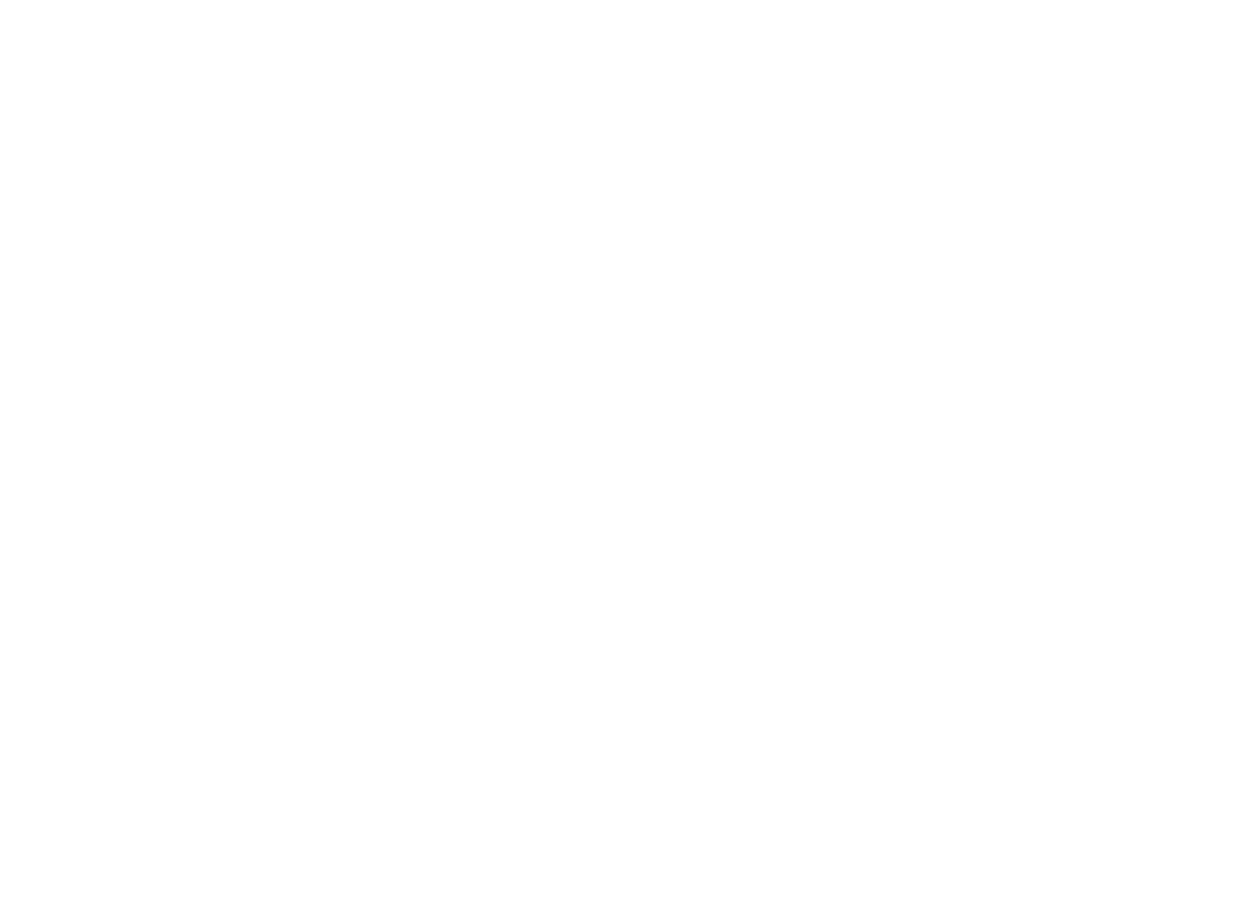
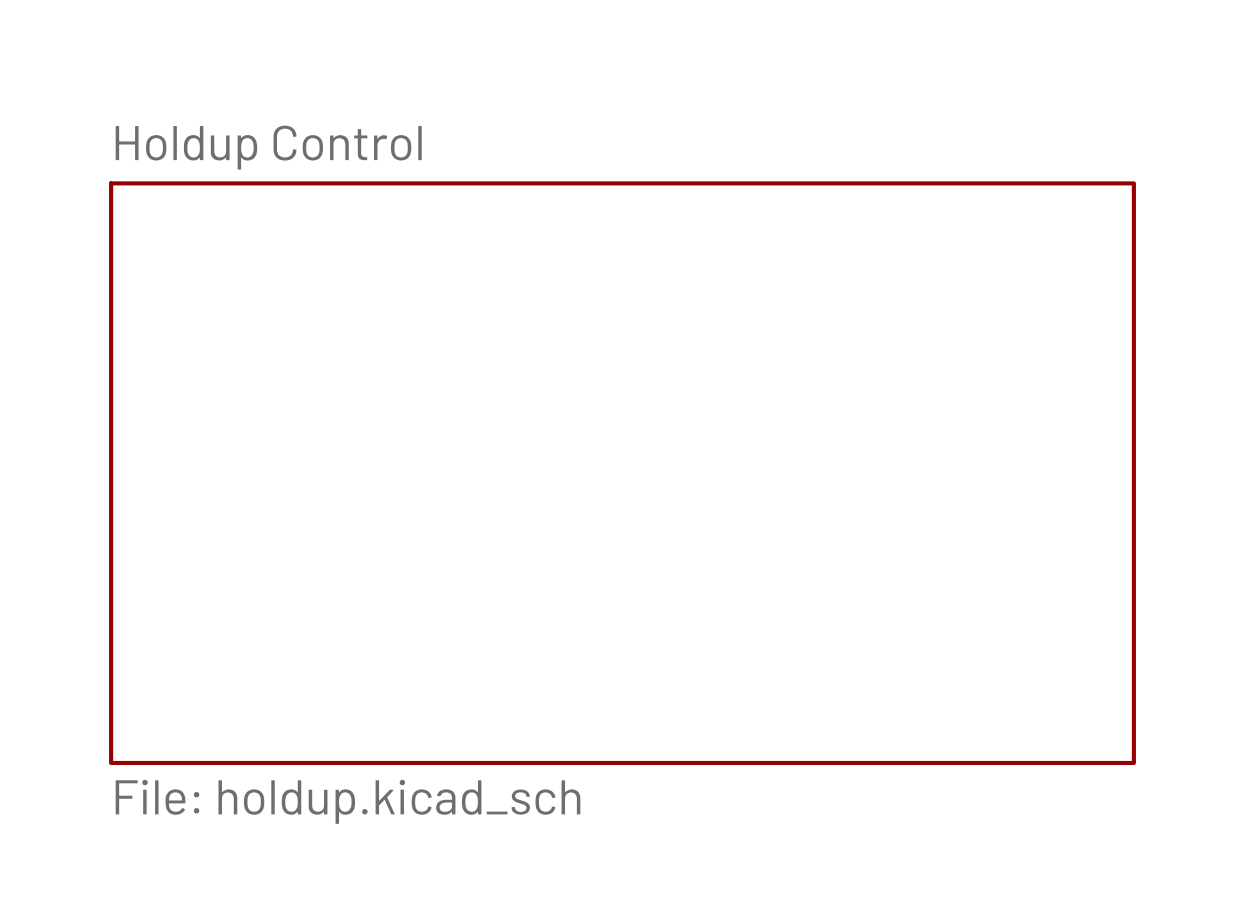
sheet Holdup Control: none -> File: holdup.kicad_sch (622, 473)

